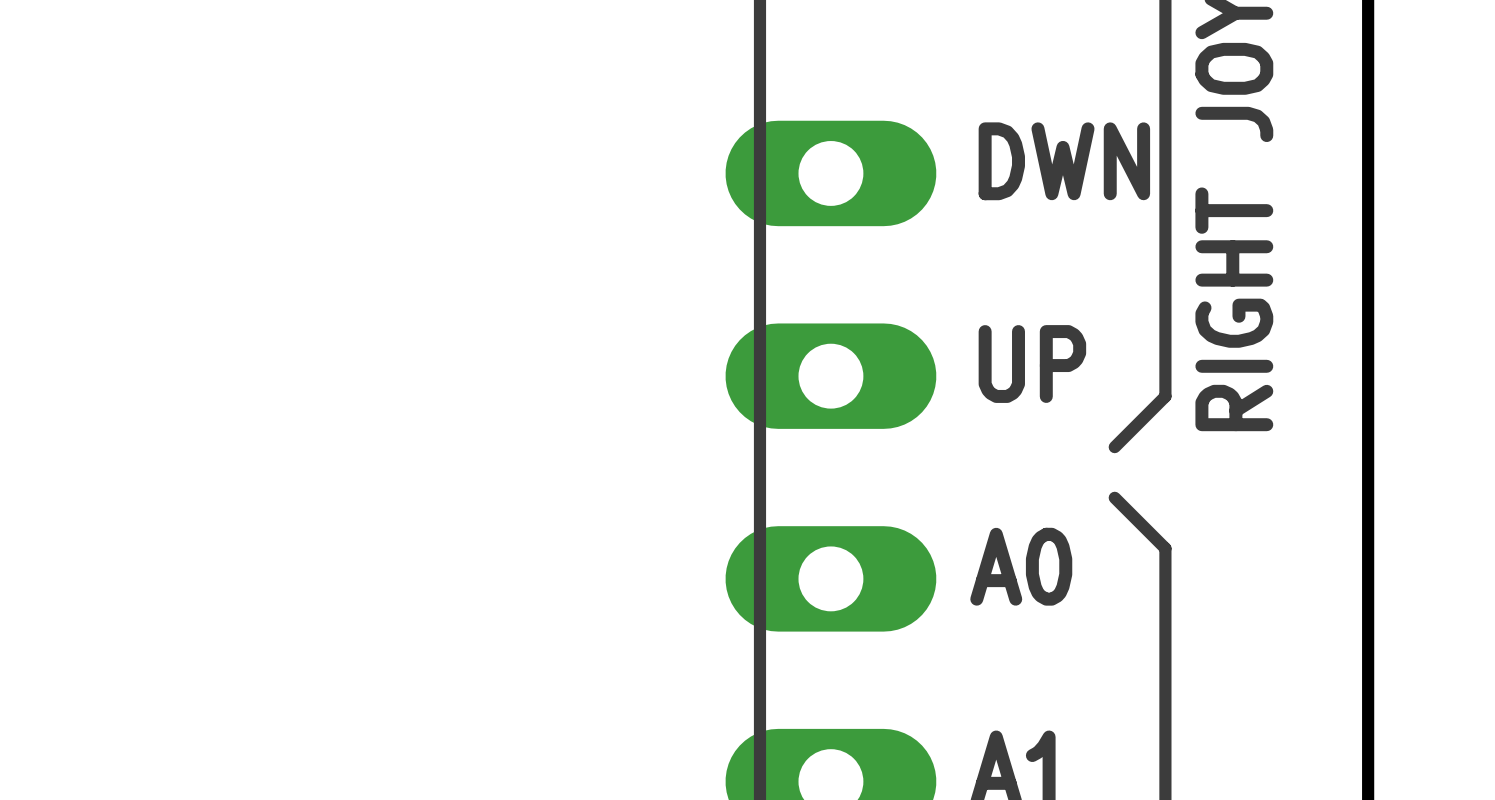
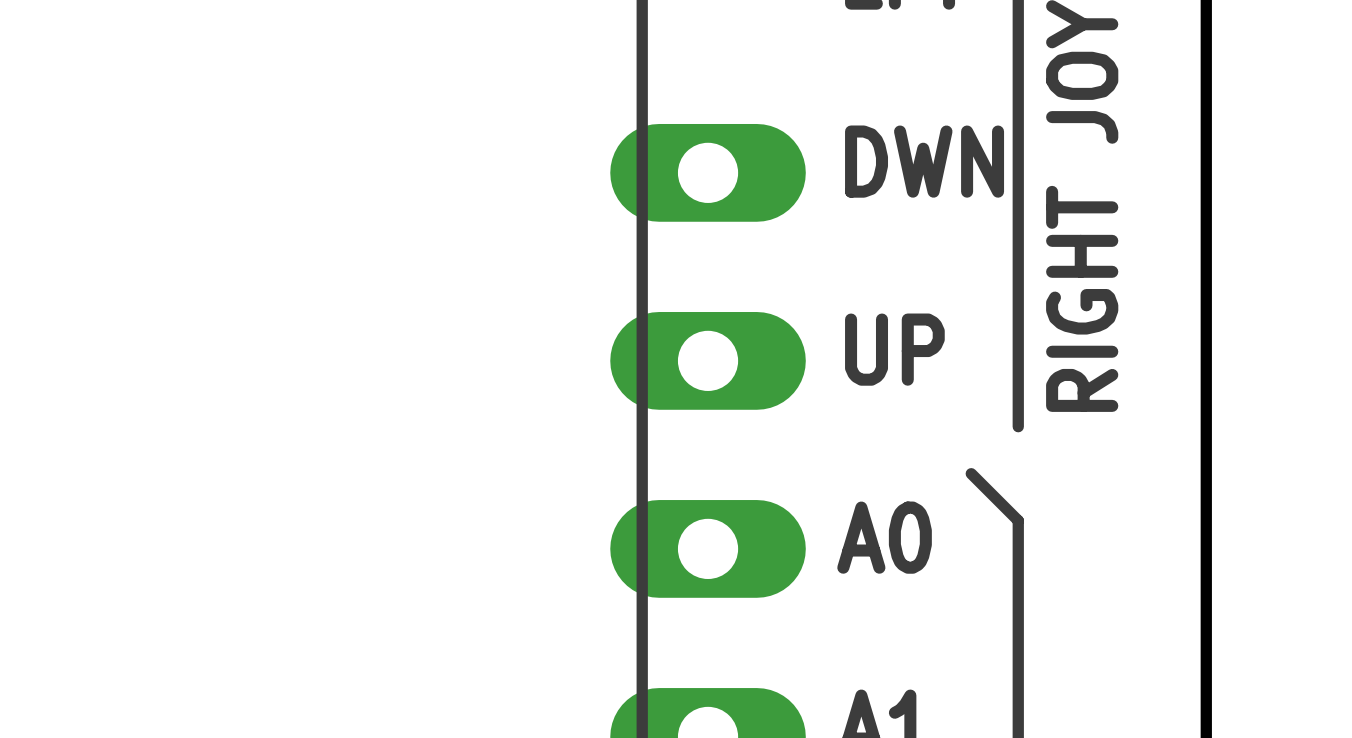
line: (1165, 396) (1114, 447) -> (1018, 379) (1018, 426)

